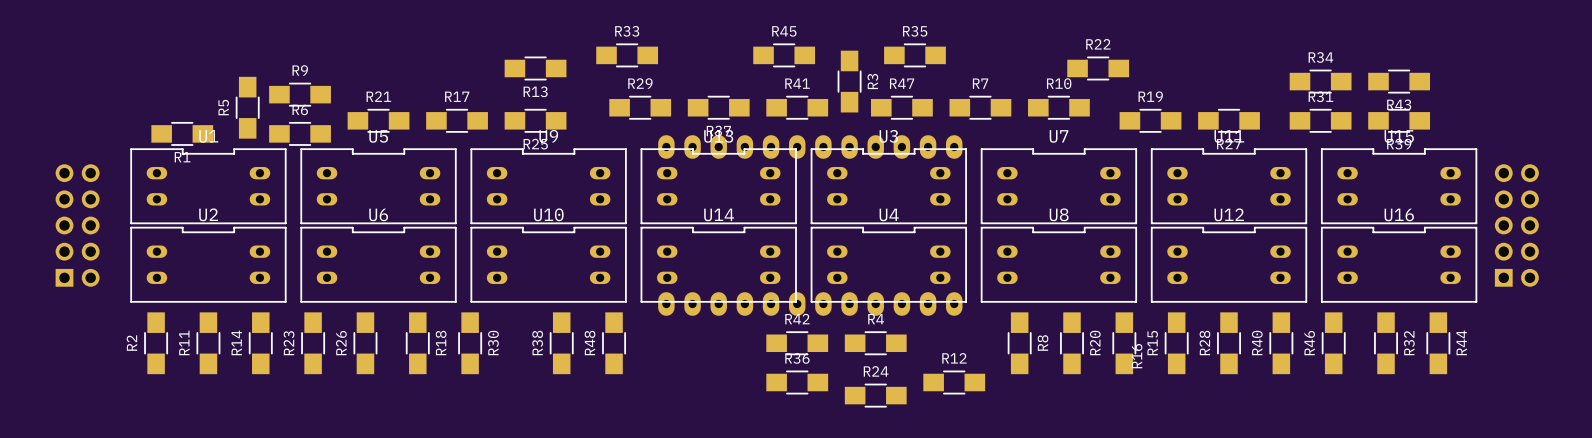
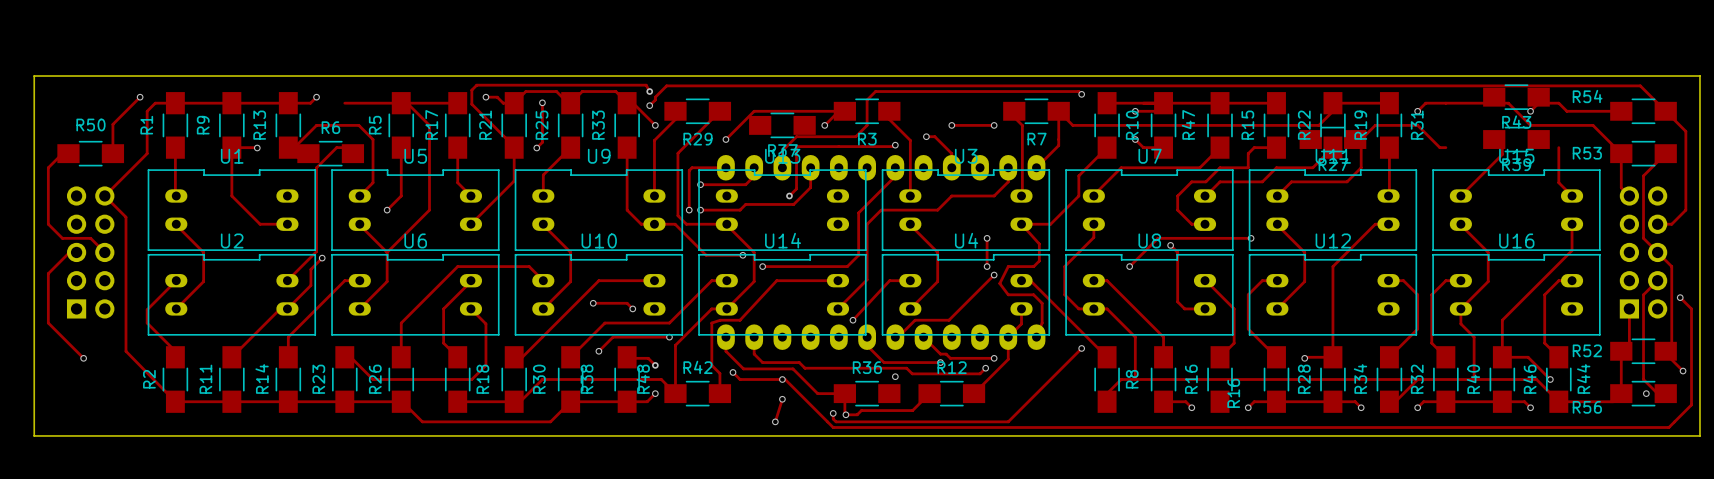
R33 name position: R33 (627, 31) -> R33 (598, 125)
R33 rotation: 0° (627, 55) -> 90° clockwise (627, 125)
R33 position: (627, 55) -> (627, 125)
R45: (784, 55) -> none
R35: (914, 55) -> none
board edge: none -> (34, 76) (1699, 76) (1699, 435) (34, 435) (34, 76)
R13 rotation: 0° (535, 68) -> 90° clockwise (288, 125)
R13 position: (535, 68) -> (288, 125)
R22 rotation: 0° (1098, 68) -> 90° clockwise (1276, 125)
R22 position: (1098, 68) -> (1276, 125)
R9 name position: R9 (300, 70) -> R9 (203, 125)
track: none -> (649, 91) (646, 85) (476, 85) (471, 90) (471, 104) (514, 146) (514, 180) (470, 224)
via: none -> (649, 91)
track: none -> (1081, 94) (1078, 91) (875, 91) (867, 100) (867, 125) (855, 136) (796, 136) (782, 150) (782, 167)
via: none -> (1081, 94)
track: none -> (140, 97) (112, 124) (112, 153)
via: none -> (140, 97)
track: none -> (316, 97) (310, 103) (155, 103) (147, 111) (147, 153) (104, 195) (125, 217) (125, 351) (175, 401) (402, 401) (422, 421) (550, 421) (570, 401) (647, 401) (655, 393)
via: none -> (316, 97)
track: none -> (485, 97) (497, 97) (503, 103) (514, 103) (525, 91) (556, 91) (568, 103) (570, 103) (582, 91) (615, 91) (627, 103) (633, 103) (655, 125)
via: none -> (485, 97)
R3 rotation: 0° (849, 81) -> 90° clockwise (867, 111)
R3 position: (849, 81) -> (867, 111)
R34: (1320, 81) -> none
R29 name position: R29 (640, 83) -> R29 (697, 139)
R7 name position: R7 (980, 83) -> R7 (1037, 139)
track: none -> (542, 102) (542, 142) (536, 148)
via: none -> (542, 102)
track: none -> (344, 103) (457, 103)
track: none -> (407, 103) (429, 125) (429, 210) (387, 252)
track: none -> (1107, 103) (1276, 103)
track: none -> (1163, 103) (1155, 111) (1135, 111)
track: none -> (1389, 103) (1332, 103) (1332, 111) (1318, 125) (1072, 125) (1058, 111) (1058, 145) (1036, 167)
track: none -> (649, 105) (666, 85) (1640, 85) (1685, 131) (1685, 210) (1671, 224) (1657, 224)
via: none -> (649, 105)
R9 rotation: 0° (300, 94) -> 90° clockwise (231, 125)
R9 position: (300, 94) -> (231, 125)
track: none -> (675, 111) (675, 119) (654, 140) (654, 195)
track: none -> (838, 111) (824, 125)
track: none -> (844, 111) (754, 111) (725, 139)
track: none -> (889, 111) (889, 119) (910, 140) (910, 195)
track: none -> (1014, 111) (1014, 117) (1022, 125) (1021, 195)
via: none -> (1135, 111)
track: none -> (1417, 111) (1425, 103) (1508, 103) (1530, 125) (1593, 125) (1621, 153) (1621, 187) (1629, 195)
via: none -> (1417, 111)
track: none -> (1530, 111) (1538, 103) (1558, 103) (1566, 111) (1621, 111)
via: none -> (1530, 111)
R54: none -> (1643, 111)
R21 name position: R21 (378, 96) -> R21 (485, 125)
R17 name position: R17 (457, 96) -> R17 (431, 124)
track: none -> (719, 117) (719, 111) (677, 153) (677, 215) (686, 224) (726, 224) (754, 252) (754, 281) (726, 308) (711, 308) (675, 345) (675, 393) (661, 379) (542, 379) (520, 401) (457, 401)
R5 position: (247, 107) -> (401, 125)
via: none -> (655, 125)
R29 position: (640, 107) -> (697, 111)
via: none -> (824, 125)
R41: (797, 107) -> none
track: none -> (951, 125) (994, 125)
via: none -> (951, 125)
R47 rotation: 0° (901, 107) -> 90° clockwise (1163, 125)
R47 position: (901, 107) -> (1163, 125)
via: none -> (994, 125)
R7 position: (980, 107) -> (1036, 111)
R10 rotation: 0° (1058, 107) -> 90° clockwise (1107, 125)
R10 position: (1058, 107) -> (1107, 125)
R15: none -> (1220, 125)
track: none -> (926, 136) (934, 136) (951, 153) (951, 167)
via: none -> (926, 136)
R21 rotation: 0° (378, 120) -> 90° clockwise (514, 125)
R21 position: (378, 120) -> (514, 125)
R17 rotation: 0° (457, 120) -> 90° clockwise (457, 125)
R17 position: (457, 120) -> (457, 125)
R25 rotation: 0° (535, 120) -> 90° clockwise (570, 125)
via: none -> (725, 139)
track: none -> (1135, 139) (1143, 147) (1163, 147)
via: none -> (1135, 139)
R19 rotation: 0° (1150, 120) -> 90° clockwise (1332, 125)
R19 position: (1150, 120) -> (1332, 125)
R31 rotation: 0° (1320, 120) -> 90° clockwise (1389, 125)
R31 position: (1320, 120) -> (1389, 125)
track: none -> (895, 145) (796, 146) (796, 188) (789, 195)
via: none -> (895, 145)
track: none -> (175, 147) (176, 195)
track: none -> (257, 148) (231, 147) (231, 195) (260, 224) (287, 224)
via: none -> (257, 148)
track: none -> (288, 147) (294, 147) (316, 125) (358, 125) (373, 139) (373, 182) (359, 195)
track: none -> (344, 147) (336, 147) (316, 167) (316, 251) (287, 280)
track: none -> (401, 147) (401, 195) (387, 210)
track: none -> (457, 147) (457, 182) (470, 195)
via: none -> (536, 148)
track: none -> (570, 147) (543, 174) (543, 195)
track: none -> (627, 147) (627, 210) (641, 224) (675, 224) (706, 255) (742, 255)
track: none -> (1107, 147) (1078, 175) (1078, 195) (1050, 224) (1021, 224) (1039, 243) (1039, 261) (1033, 266) (1008, 266) (999, 283) (1008, 294) (1033, 294) (1042, 303) (1042, 323) (1036, 337)
track: none -> (1220, 147) (1199, 167) (1121, 167) (1093, 195)
track: none -> (1276, 147) (1254, 147) (1248, 153) (1248, 167) (1220, 167) (1205, 181) (1191, 181) (1177, 195) (1177, 210) (1191, 224) (1205, 224)
track: none -> (1332, 147) (1312, 167) (1276, 167) (1262, 181) (1220, 181) (1205, 195)
track: none -> (1389, 147) (1388, 195)
track: none -> (1445, 147) (1439, 147) (1417, 125) (1375, 125) (1361, 139) (1361, 167) (1347, 181) (1291, 181) (1277, 195)
track: none -> (1502, 147) (1502, 154) (1460, 195)
track: none -> (1558, 147) (1558, 182) (1572, 195)
track: none -> (68, 153) (62, 153) (48, 167) (48, 224) (62, 238) (90, 238) (104, 252)
R50: none -> (90, 153)
R1 rotation: 0° (182, 133) -> 90° clockwise (175, 125)
R53: none -> (1643, 153)
track: none -> (1665, 153) (1643, 175) (1643, 238) (1671, 266) (1671, 345) (1665, 353) (1683, 371)
track: none -> (725, 167) (692, 167) (689, 170) (689, 210)
track: none -> (754, 167) (754, 176) (745, 184) (700, 184)
track: none -> (810, 167) (810, 187) (793, 204) (745, 204) (740, 210) (700, 210)
track: none -> (895, 167) (895, 176) (858, 212) (858, 255) (847, 266) (762, 266)
track: none -> (1008, 167) (1008, 181) (994, 195) (951, 195) (937, 210) (881, 210) (867, 224) (867, 279) (838, 308)
via: none -> (700, 184)
via: none -> (789, 195)
via: none -> (387, 210)
via: none -> (689, 210)
via: none -> (700, 210)
track: none -> (176, 224) (203, 252) (203, 281) (176, 308)
track: none -> (359, 224) (387, 252)
track: none -> (543, 224) (570, 252) (570, 281) (542, 309)
track: none -> (910, 224) (937, 252) (937, 281) (910, 308)
track: none -> (1093, 224) (1093, 237) (1064, 266) (1064, 294) (1078, 308) (1107, 308) (1135, 337) (1135, 379)
track: none -> (1277, 224) (1304, 252) (1304, 281) (1277, 308)
track: none -> (1388, 224) (1375, 224) (1332, 266) (1332, 357) (1304, 358)
track: none -> (1460, 224) (1488, 252) (1488, 281) (1460, 308) (1460, 323) (1474, 337) (1474, 379)
track: none -> (1572, 224) (1572, 250) (1502, 320) (1502, 357) (1528, 357) (1550, 379)
track: none -> (987, 238) (987, 266)
via: none -> (987, 238)
track: none -> (1251, 238) (1157, 238) (1129, 266)
via: none -> (1251, 238)
track: none -> (1170, 245) (1177, 252) (1177, 301) (1184, 308) (1205, 308)
via: none -> (1170, 245)
track: none -> (76, 252) (69, 252) (48, 273) (48, 323) (83, 358)
track: none -> (387, 252) (387, 281) (359, 308)
via: none -> (742, 255)
track: none -> (322, 258) (310, 269) (310, 285) (287, 308) (280, 308) (231, 357)
via: none -> (322, 258)
via: none -> (762, 266)
via: none -> (987, 266)
via: none -> (1129, 266)
track: none -> (994, 275) (948, 320) (915, 320) (898, 337) (895, 337)
via: none -> (994, 275)
track: none -> (176, 280) (147, 309) (147, 323) (175, 351) (175, 357)
track: none -> (359, 280) (344, 280) (288, 337) (288, 357)
track: none -> (470, 280) (443, 308) (443, 343) (457, 357)
track: none -> (543, 280) (529, 266) (457, 266) (401, 323) (401, 357)
track: none -> (654, 280) (598, 280) (522, 357) (514, 357)
track: none -> (726, 280) (711, 280) (669, 323) (604, 323) (570, 357)
track: none -> (837, 280) (776, 280) (740, 320) (720, 320) (711, 323) (711, 365) (719, 373) (719, 393)
track: none -> (910, 280) (889, 280) (852, 320)
track: none -> (1021, 280) (1030, 280) (1107, 357)
track: none -> (1093, 280) (1107, 280) (1163, 337) (1163, 357)
track: none -> (1205, 280) (1234, 308) (1234, 343) (1220, 357)
track: none -> (1277, 280) (1262, 280) (1248, 294) (1248, 329) (1276, 357)
track: none -> (1388, 280) (1403, 280) (1417, 294) (1417, 329) (1389, 357)
track: none -> (1460, 280) (1445, 280) (1431, 294) (1431, 343) (1445, 357)
track: none -> (1572, 280) (1558, 280) (1544, 294) (1544, 343) (1558, 357)
track: none -> (1657, 280) (1643, 294) (1643, 379) (1657, 393)
track: none -> (1680, 297) (1691, 308) (1691, 404) (1668, 427) (833, 427) (785, 379) (740, 379) (733, 372)
via: none -> (1680, 297)
track: none -> (593, 303) (627, 303) (632, 308)
via: none -> (593, 303)
track: none -> (470, 308) (485, 323) (485, 365) (471, 379) (373, 379) (350, 357) (344, 357)
via: none -> (632, 308)
track: none -> (1021, 308) (1021, 323) (1008, 337) (1008, 359) (974, 393)
track: none -> (1629, 308) (1629, 343) (1621, 351) (1621, 393) (1613, 401) (1558, 401) (1536, 379) (1121, 379) (1107, 393) (1107, 401)
via: none -> (852, 320)
track: none -> (669, 337) (613, 337) (598, 351)
via: none -> (669, 337)
track: none -> (725, 337) (725, 351) (743, 368) (792, 368) (817, 393) (844, 393)
track: none -> (754, 337) (754, 354) (762, 362) (799, 362) (804, 368) (906, 368) (912, 373) (980, 373) (985, 368)
track: none -> (867, 337) (867, 345) (884, 362) (940, 362)
track: none -> (923, 337) (940, 354) (946, 354) (950, 358) (994, 358)
track: none -> (1081, 348) (1008, 421) (836, 421) (833, 419) (833, 413)
via: none -> (1081, 348)
via: none -> (598, 351)
R52: none -> (1643, 351)
track: none -> (627, 357) (648, 358) (655, 365)
via: none -> (83, 358)
via: none -> (994, 358)
via: none -> (1304, 358)
via: none -> (940, 362)
via: none -> (655, 365)
via: none -> (985, 368)
via: none -> (1683, 371)
via: none -> (733, 372)
via: none -> (895, 376)
R28 name: R28 (1204, 342) -> R34 (1360, 378)
R38 position: (561, 343) -> (570, 379)
R48 position: (614, 343) -> (627, 379)
via: none -> (782, 379)
R42 position: (797, 343) -> (697, 393)
R4: (875, 343) -> none
R20 name: R20 (1095, 343) -> R16 (1191, 379)
R15 name: R15 (1152, 343) -> R28 (1304, 379)
R40 name: R40 (1257, 343) -> R32 (1417, 379)
track: none -> (1417, 379) (1395, 401) (1389, 401)
R46 name: R46 (1309, 343) -> R40 (1473, 379)
R32 name: R32 (1409, 343) -> R46 (1529, 379)
via: none -> (1550, 379)
track: none -> (844, 387) (845, 414) (857, 414) (861, 410) (912, 410) (929, 393)
via: none -> (655, 393)
R56: none -> (1643, 393)
via: none -> (1646, 393)
track: none -> (782, 399) (775, 421)
via: none -> (782, 399)
track: none -> (1163, 401) (1185, 401) (1191, 407)
via: none -> (1191, 407)
track: none -> (1248, 407) (1254, 401) (1355, 401) (1361, 407)
via: none -> (1248, 407)
via: none -> (1361, 407)
track: none -> (1417, 407) (1423, 401) (1524, 401) (1530, 407)
via: none -> (1417, 407)
via: none -> (1530, 407)
via: none -> (833, 413)
via: none -> (845, 414)
via: none -> (775, 421)
R36 position: (797, 382) -> (867, 393)
R12 position: (954, 382) -> (951, 393)
R24: (875, 395) -> none

